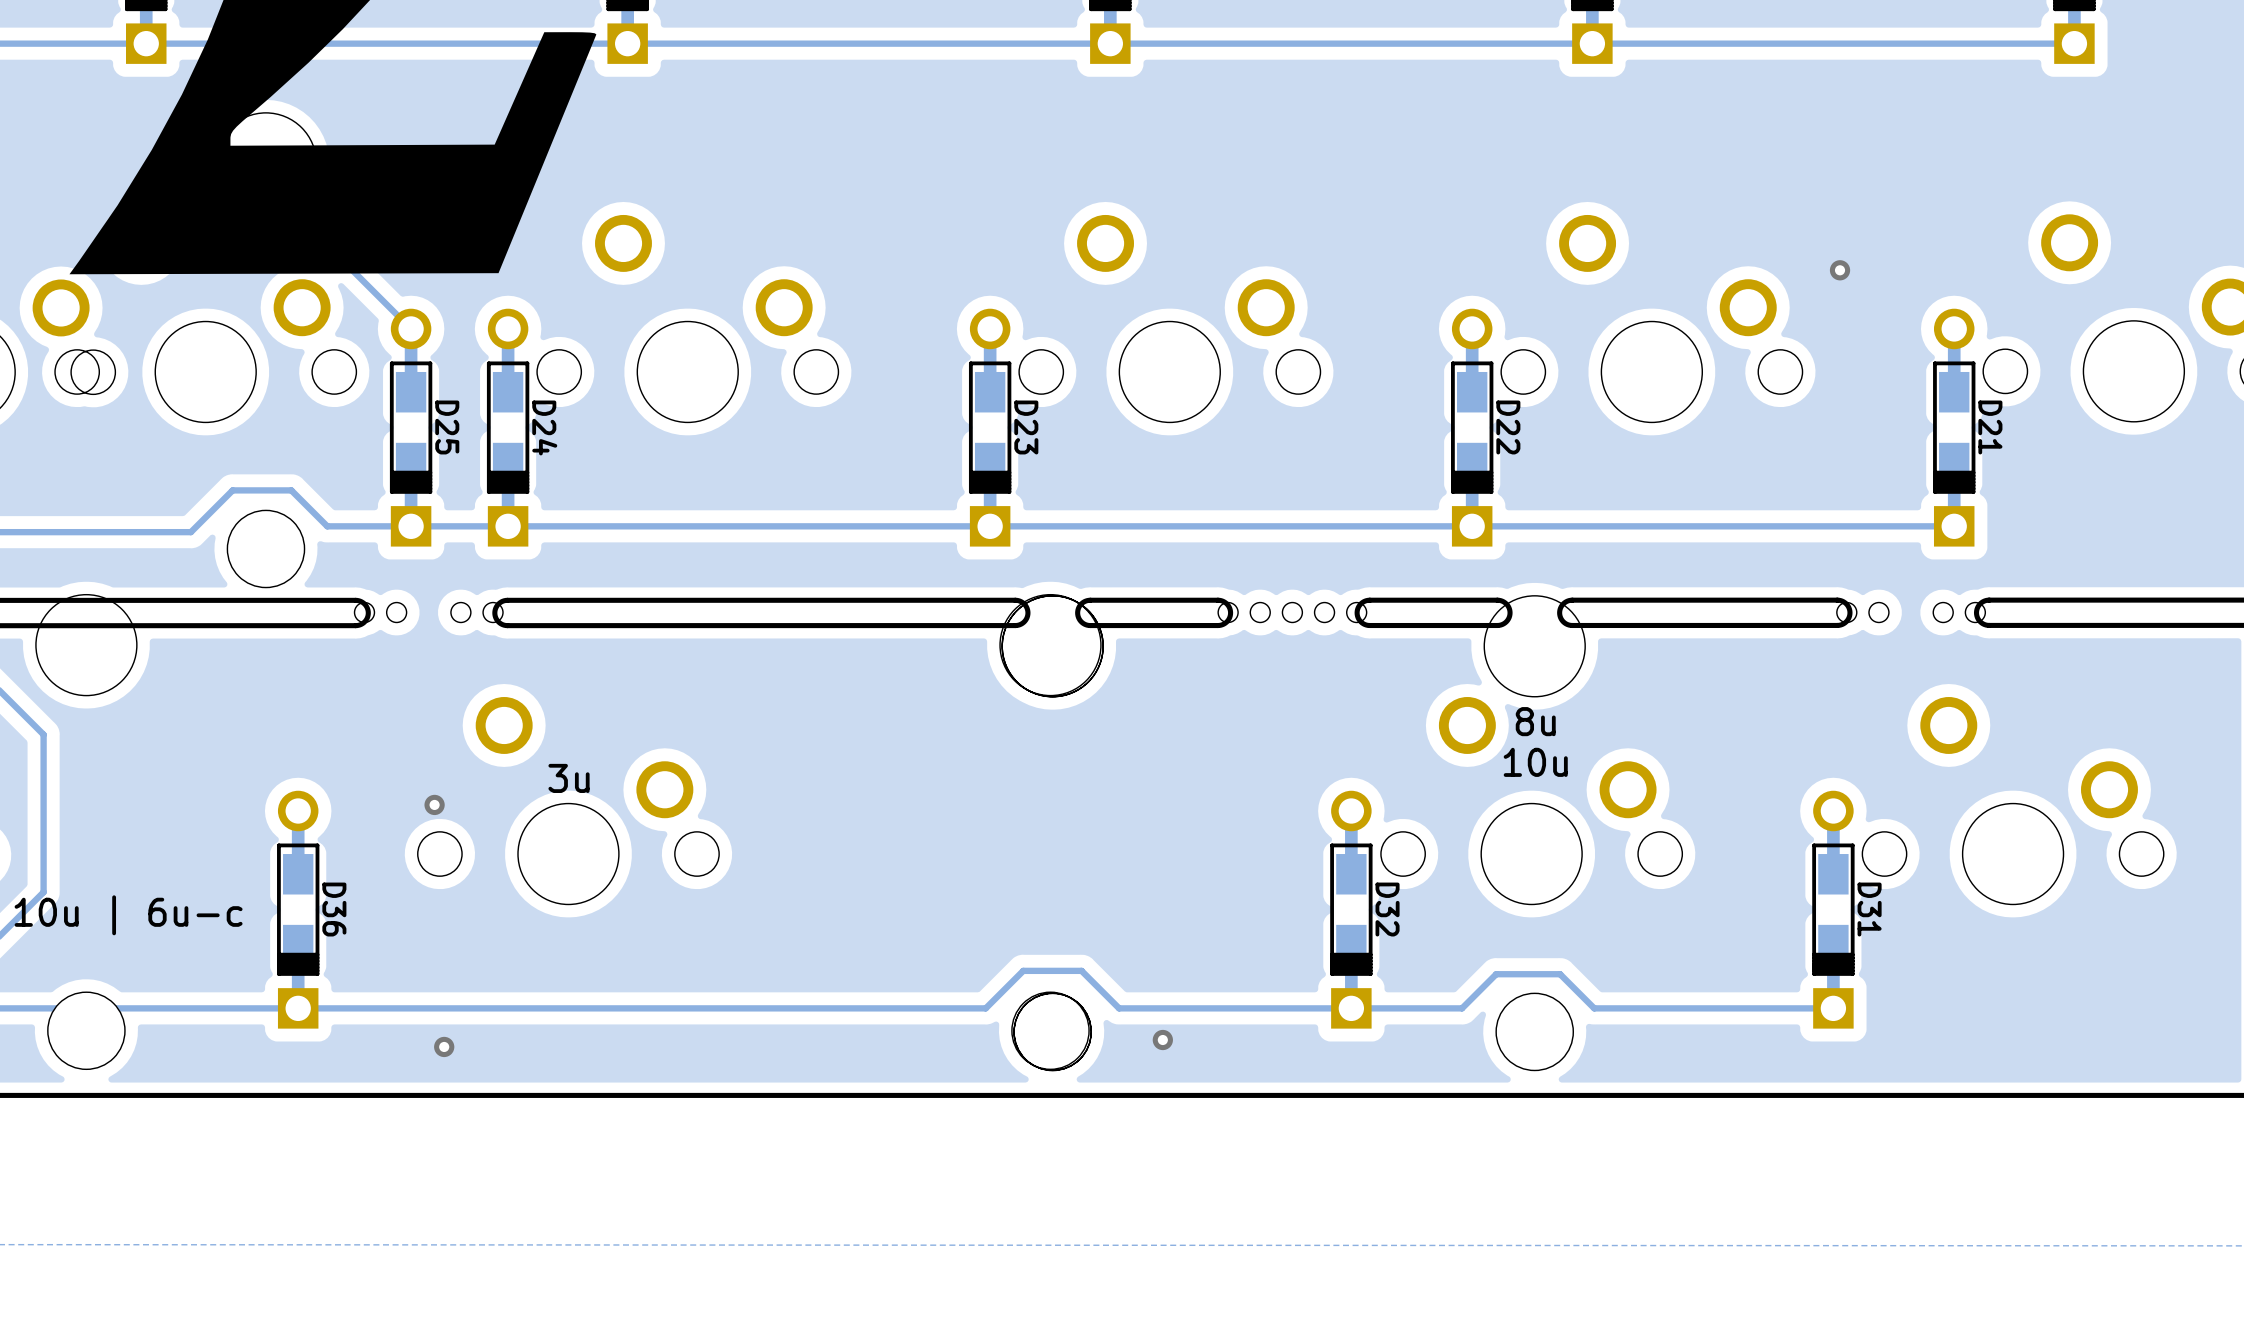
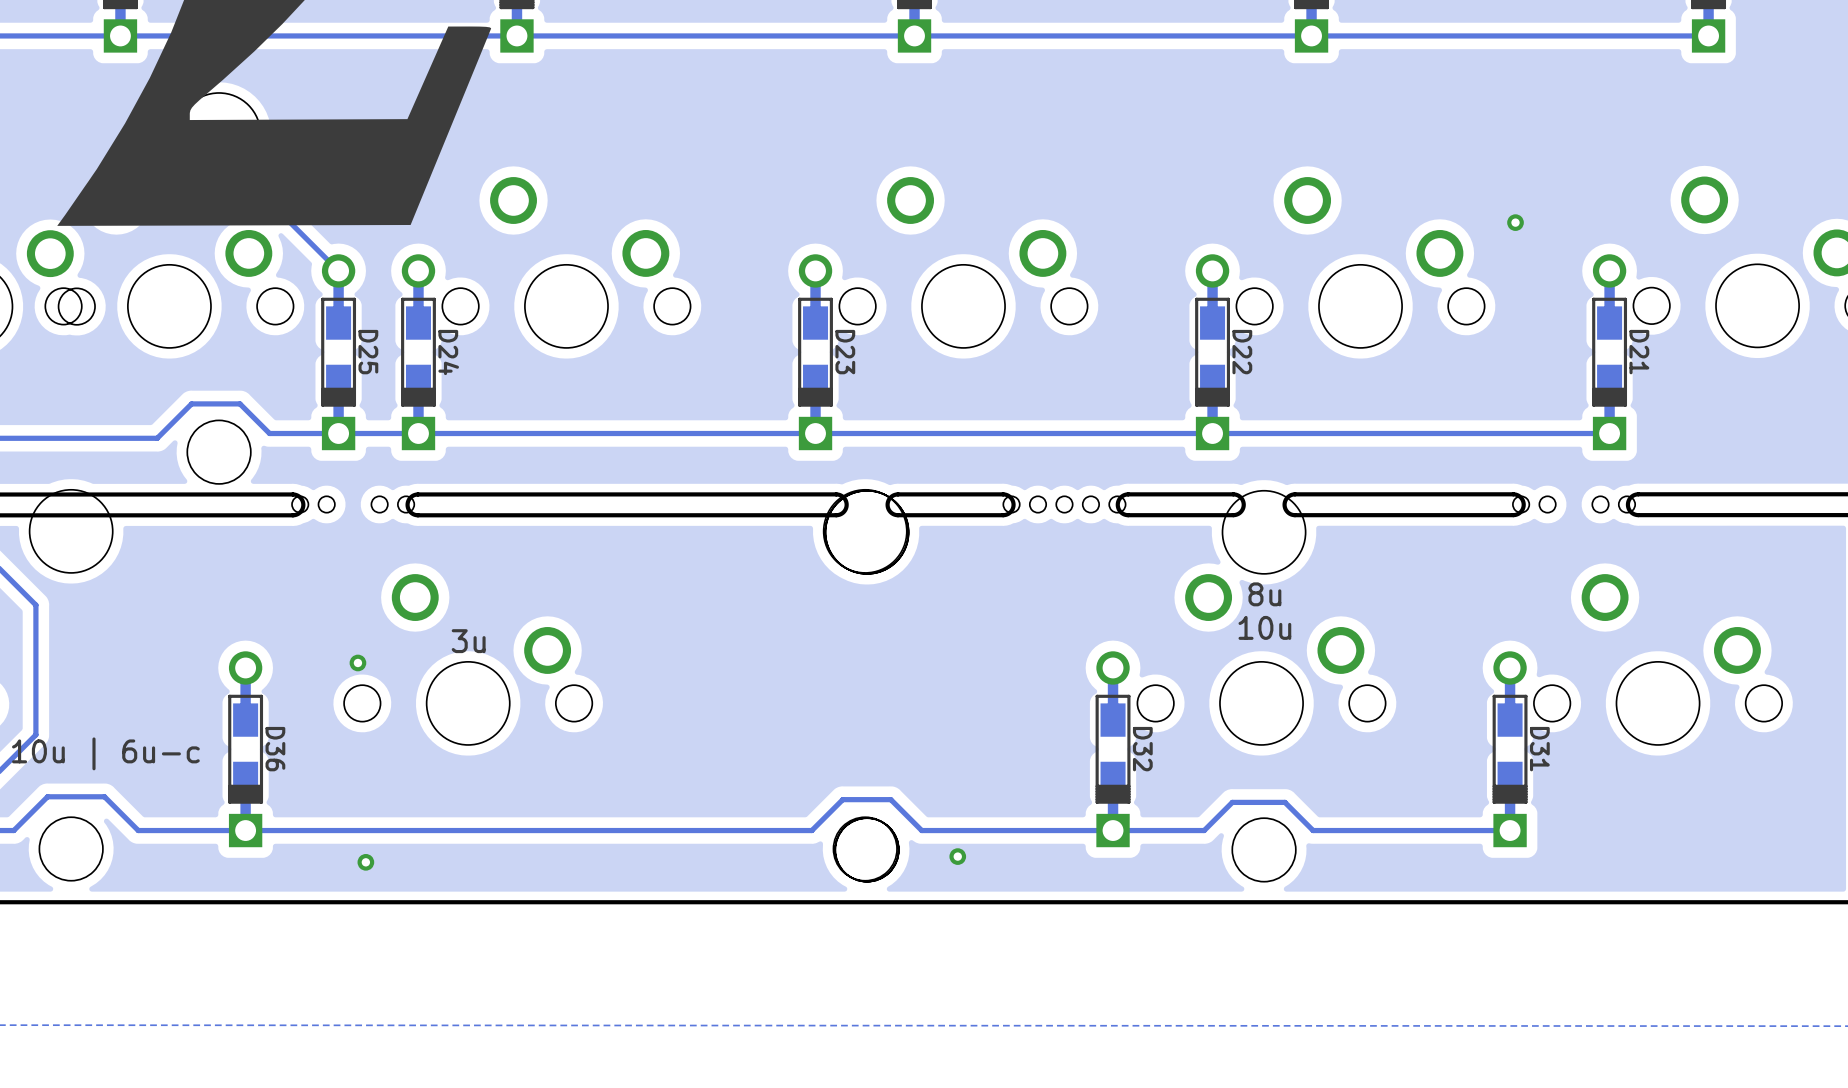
track: (167, 1008) (16, 1008) -> (138, 830) (104, 796) (47, 796) (13, 830)

